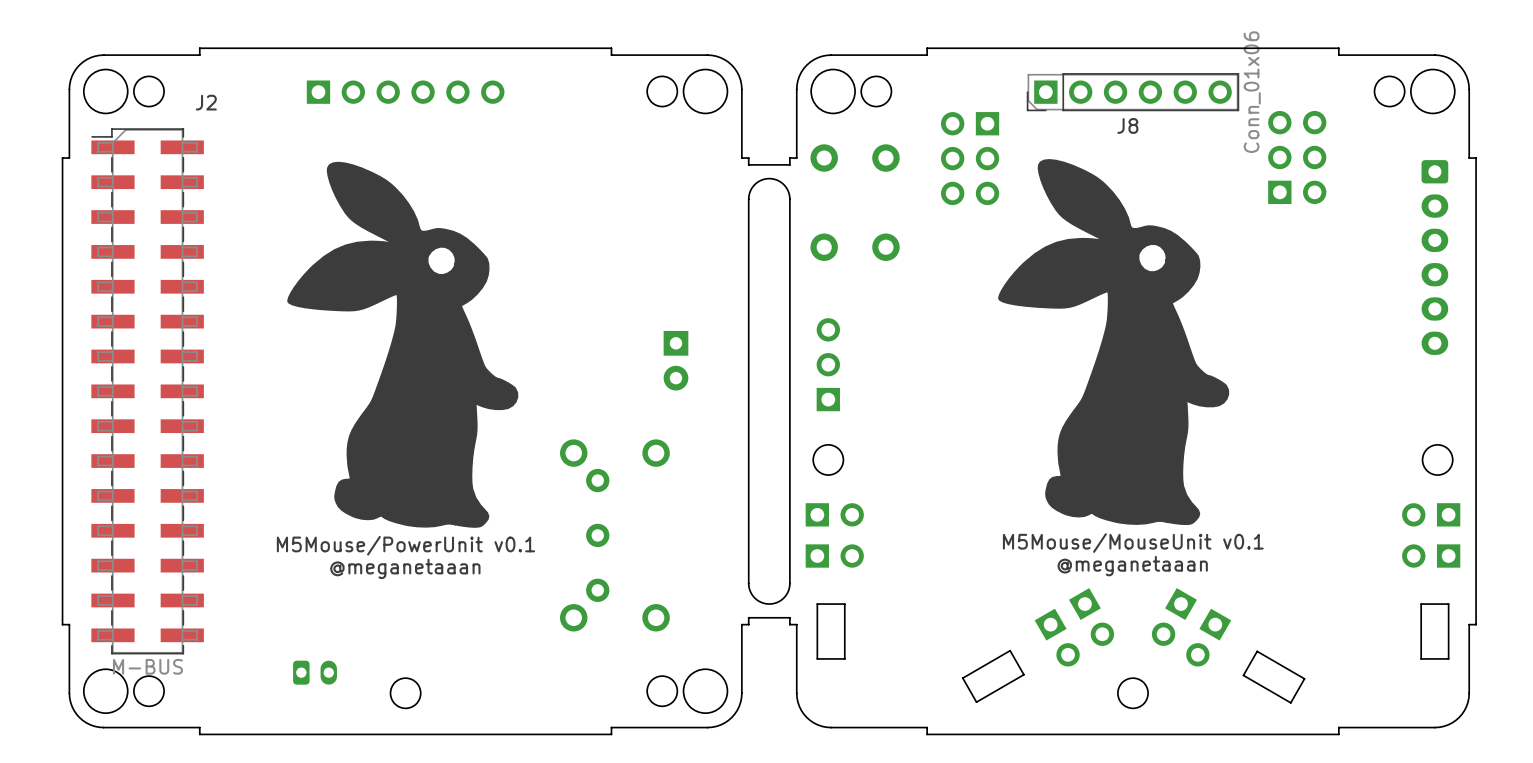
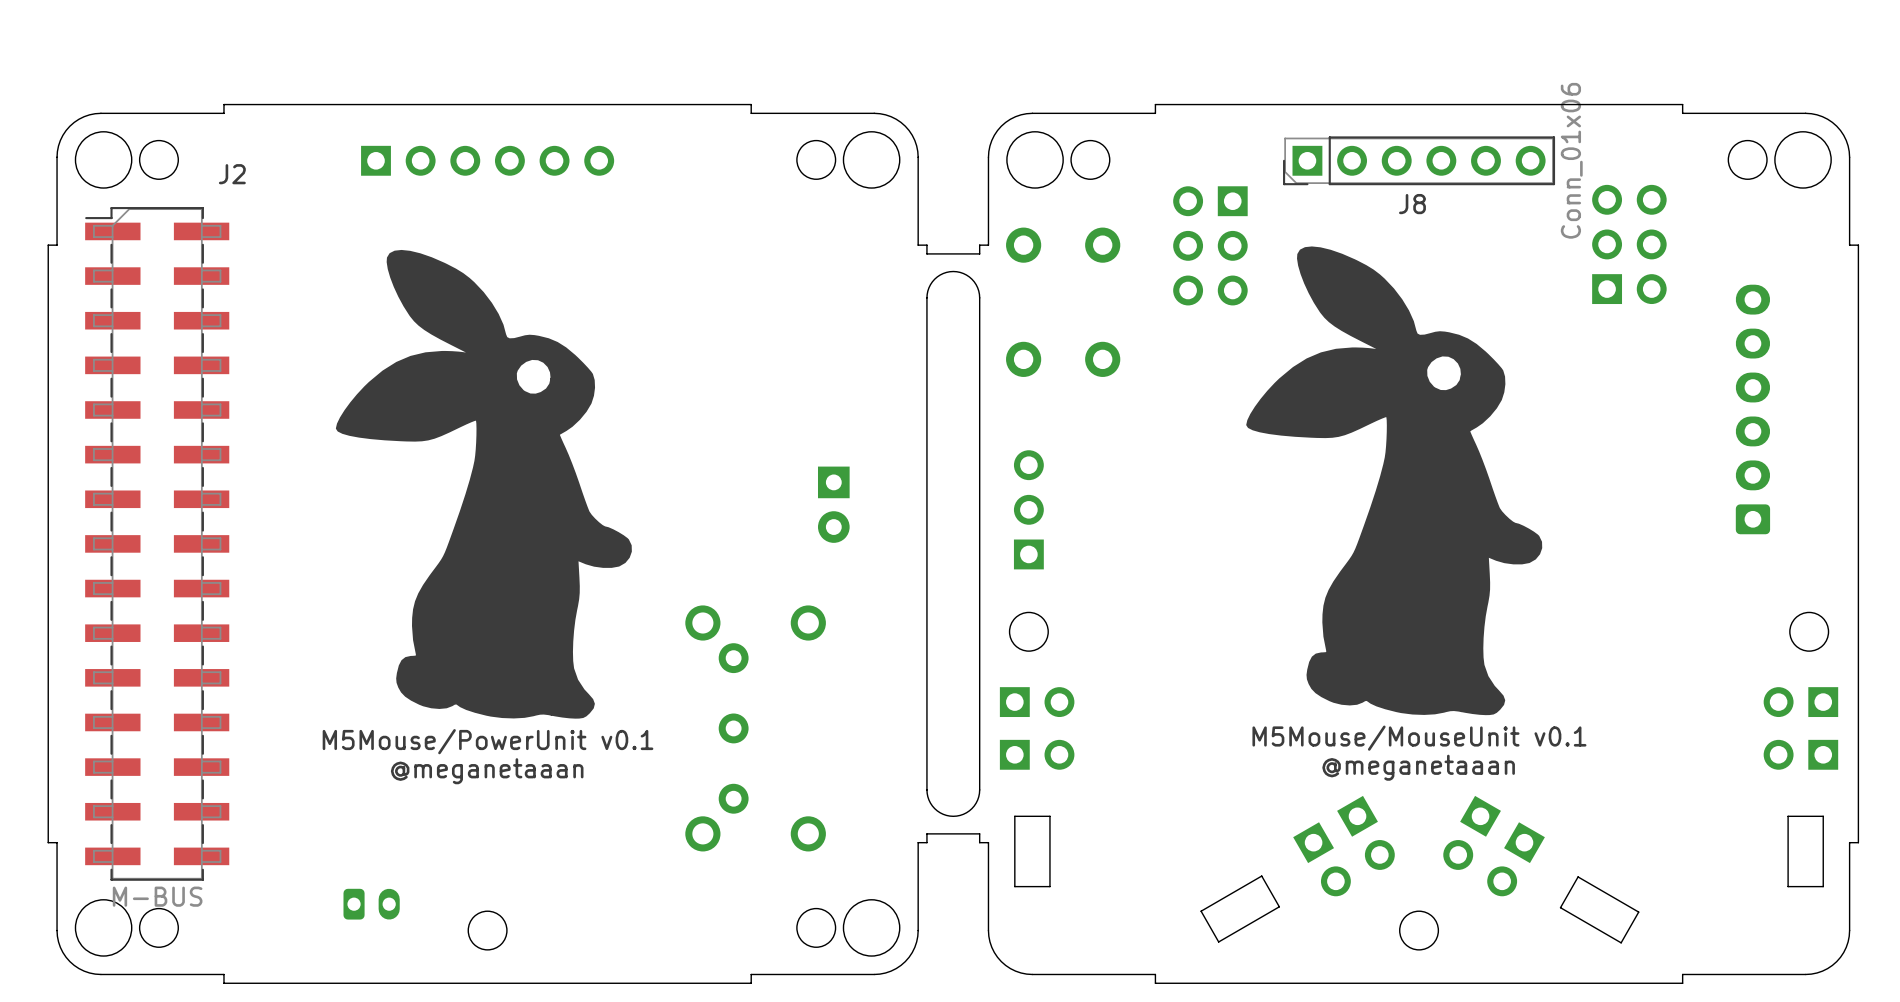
part rotation: 0° (1434, 257) -> 180° (1752, 409)

